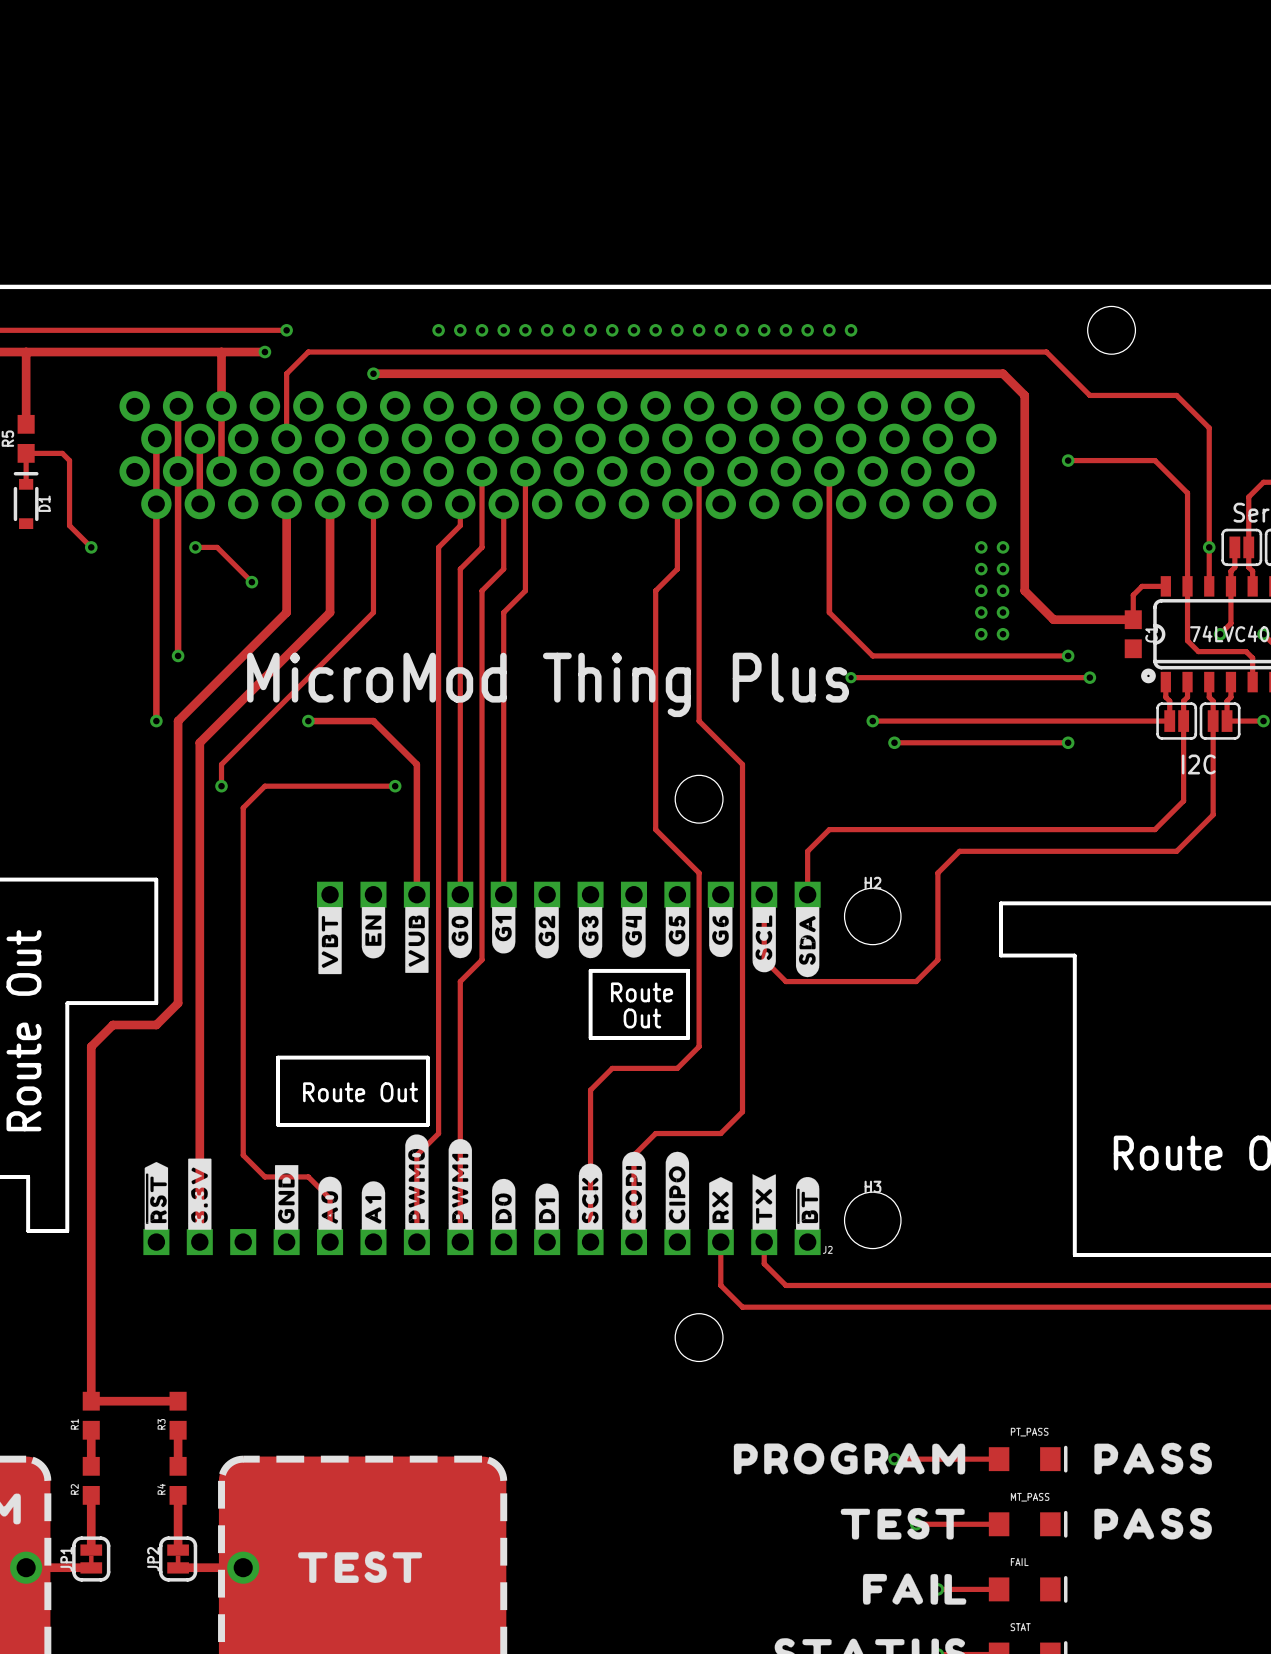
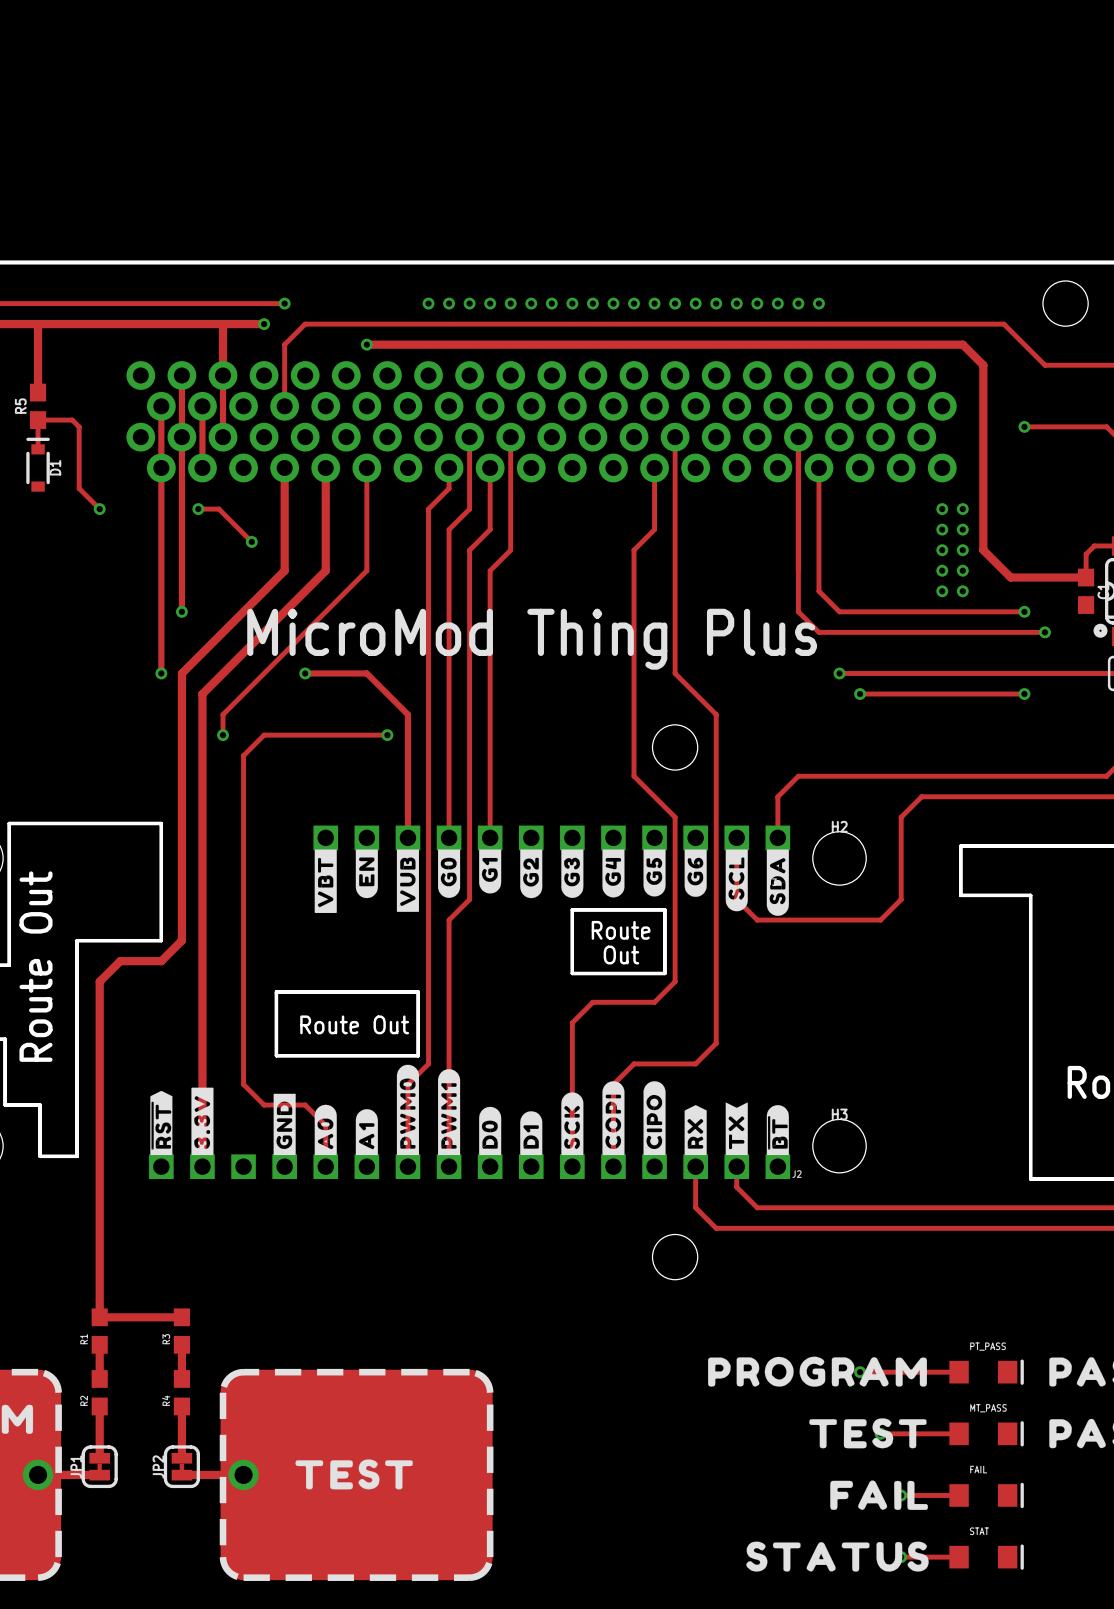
track: none -> (818, 467) (818, 591)
track: (829, 612) (851, 634) -> (798, 570) (798, 611) (818, 632)
via: (851, 677) -> none

